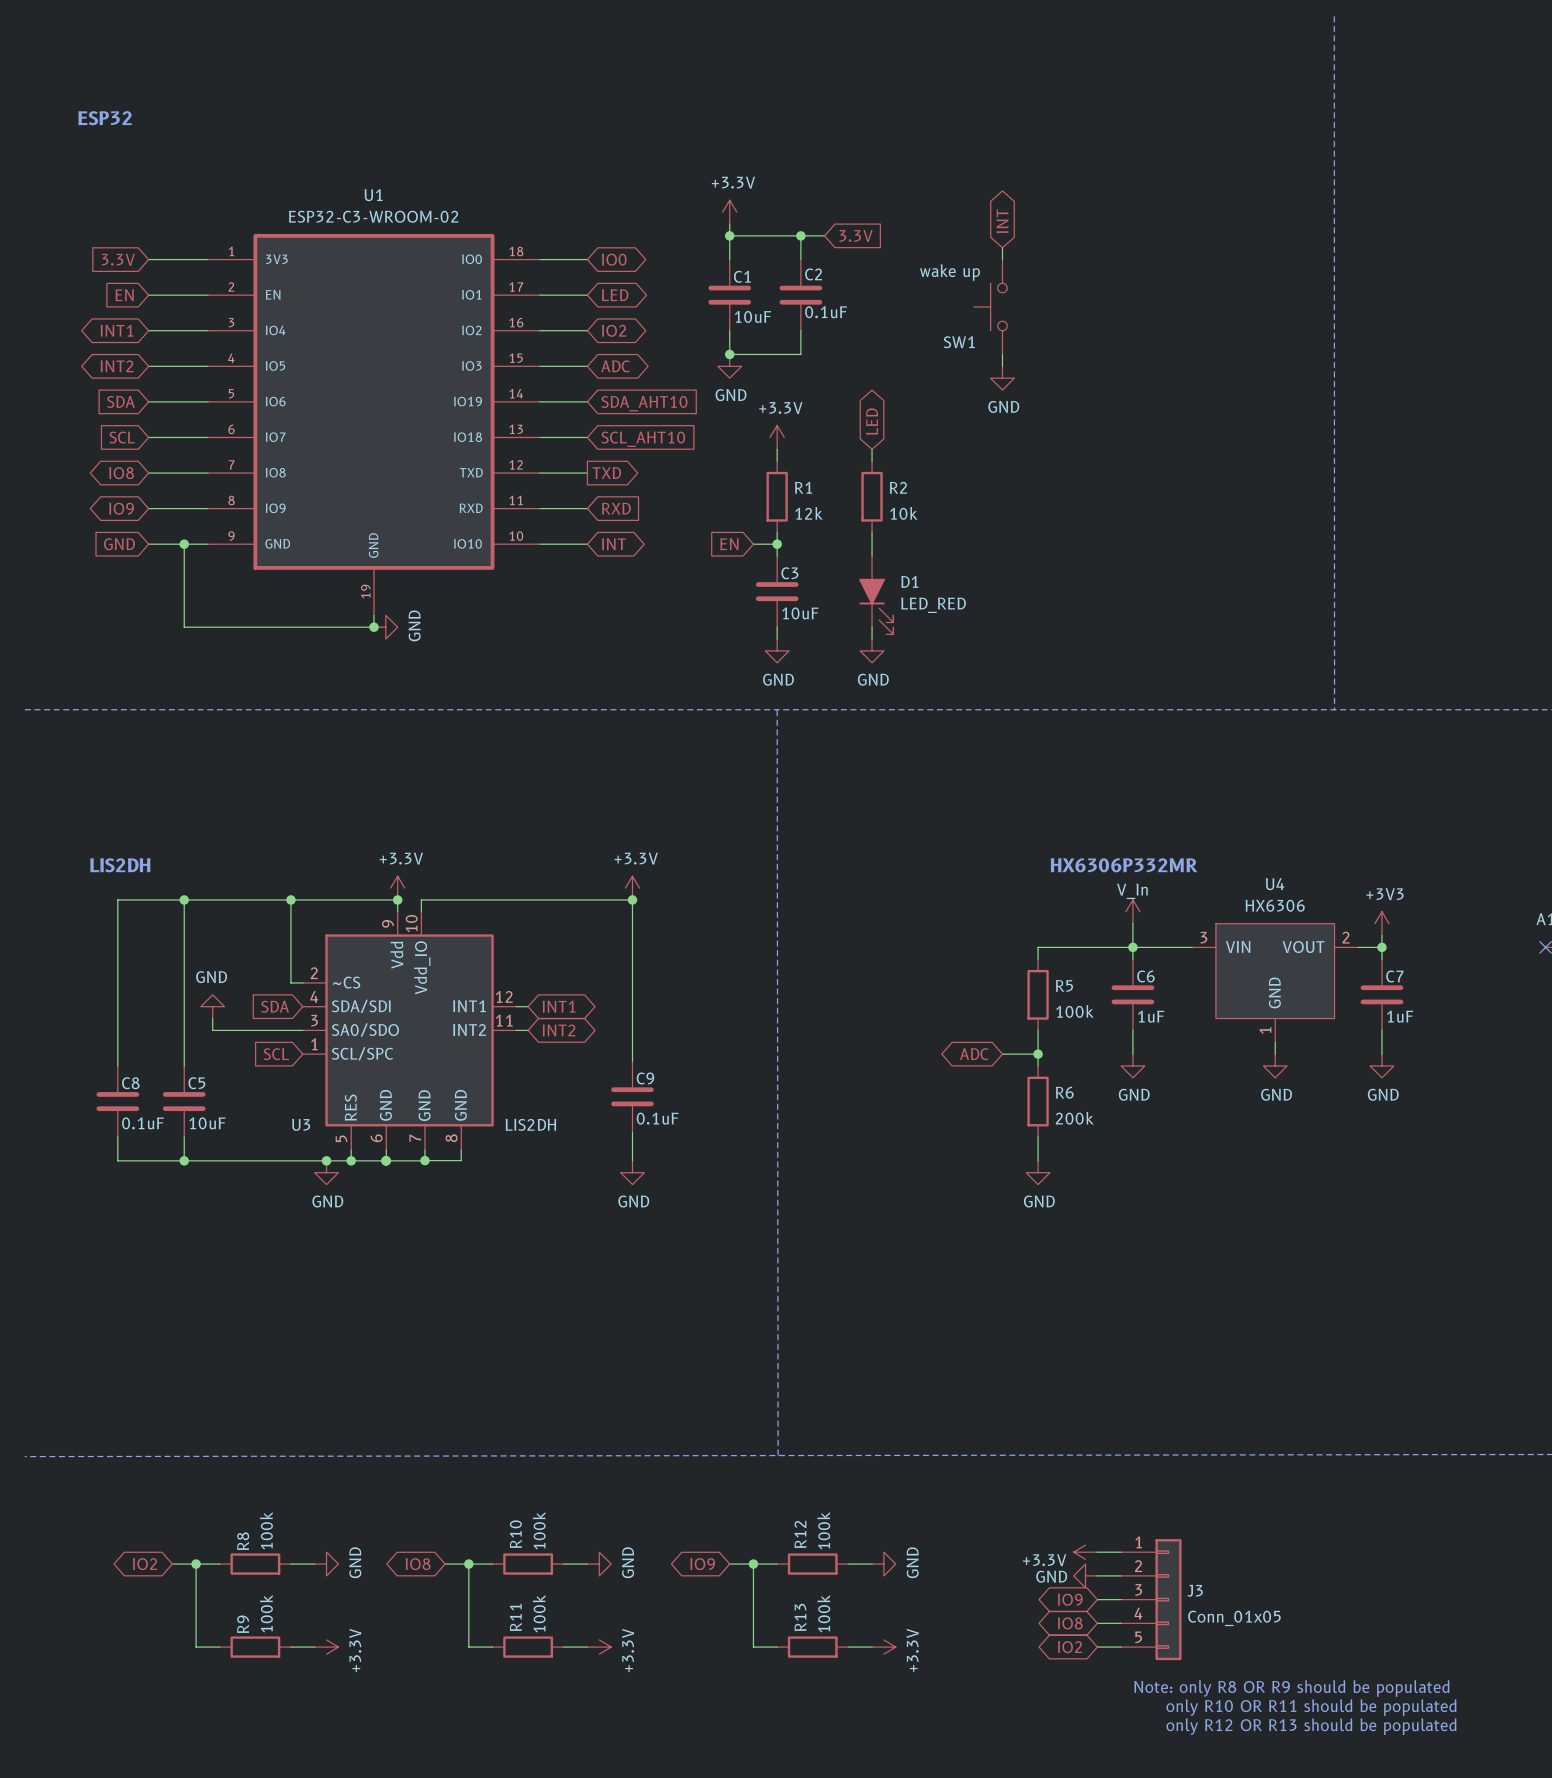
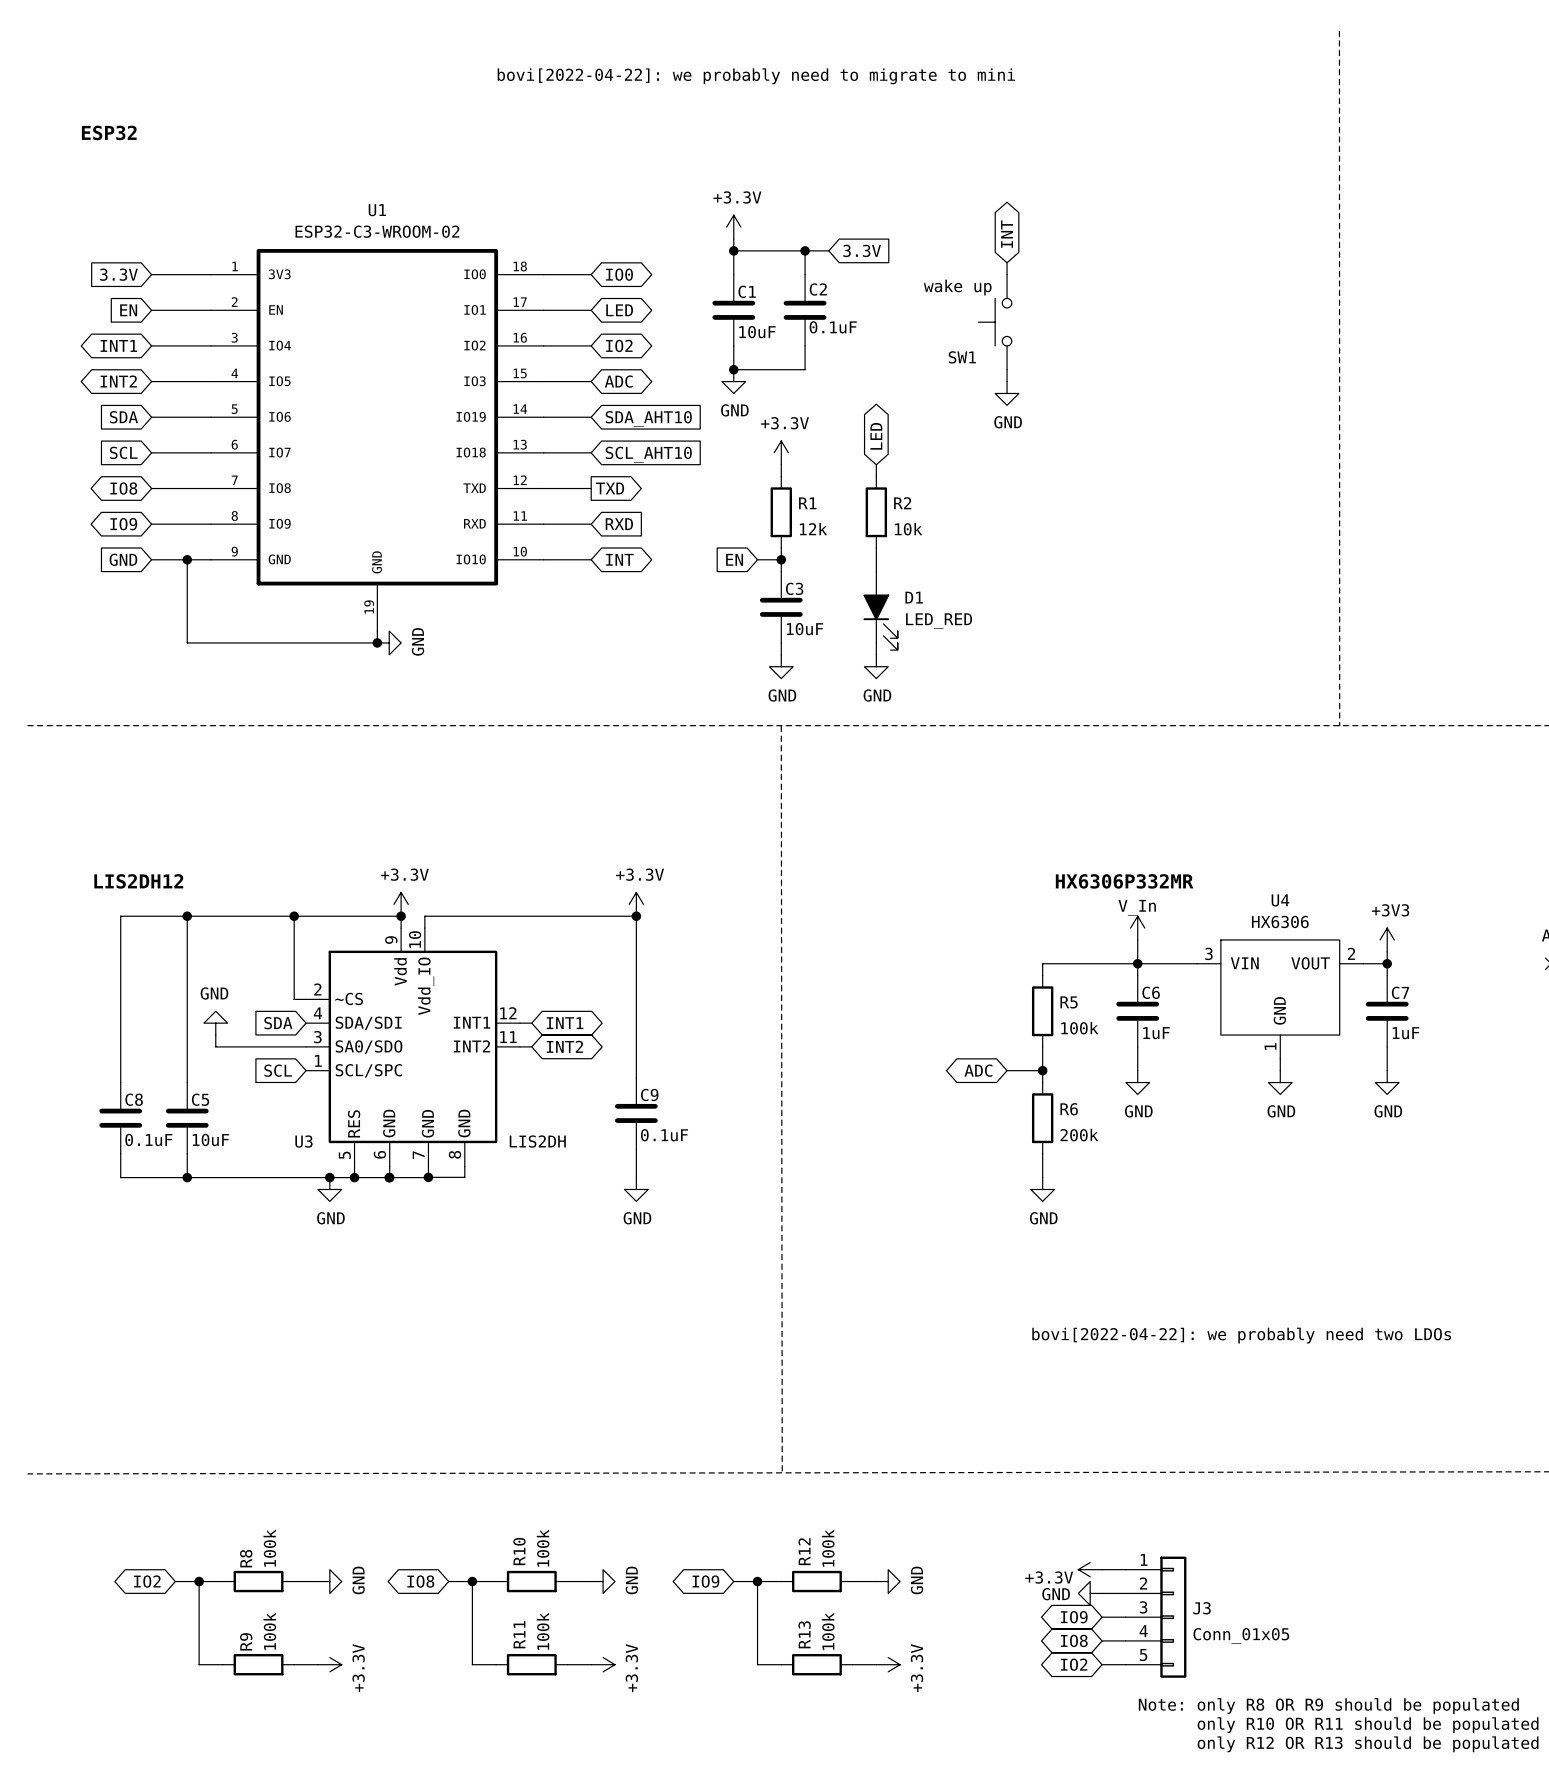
text: none -> bovi[2022-04-22]: we probably need to migrate to mini (756, 76)
text: LIS2DH (120, 865) -> LIS2DH12 (138, 881)
text: none -> bovi[2022-04-22]: we probably need two LDOs (1241, 1335)

